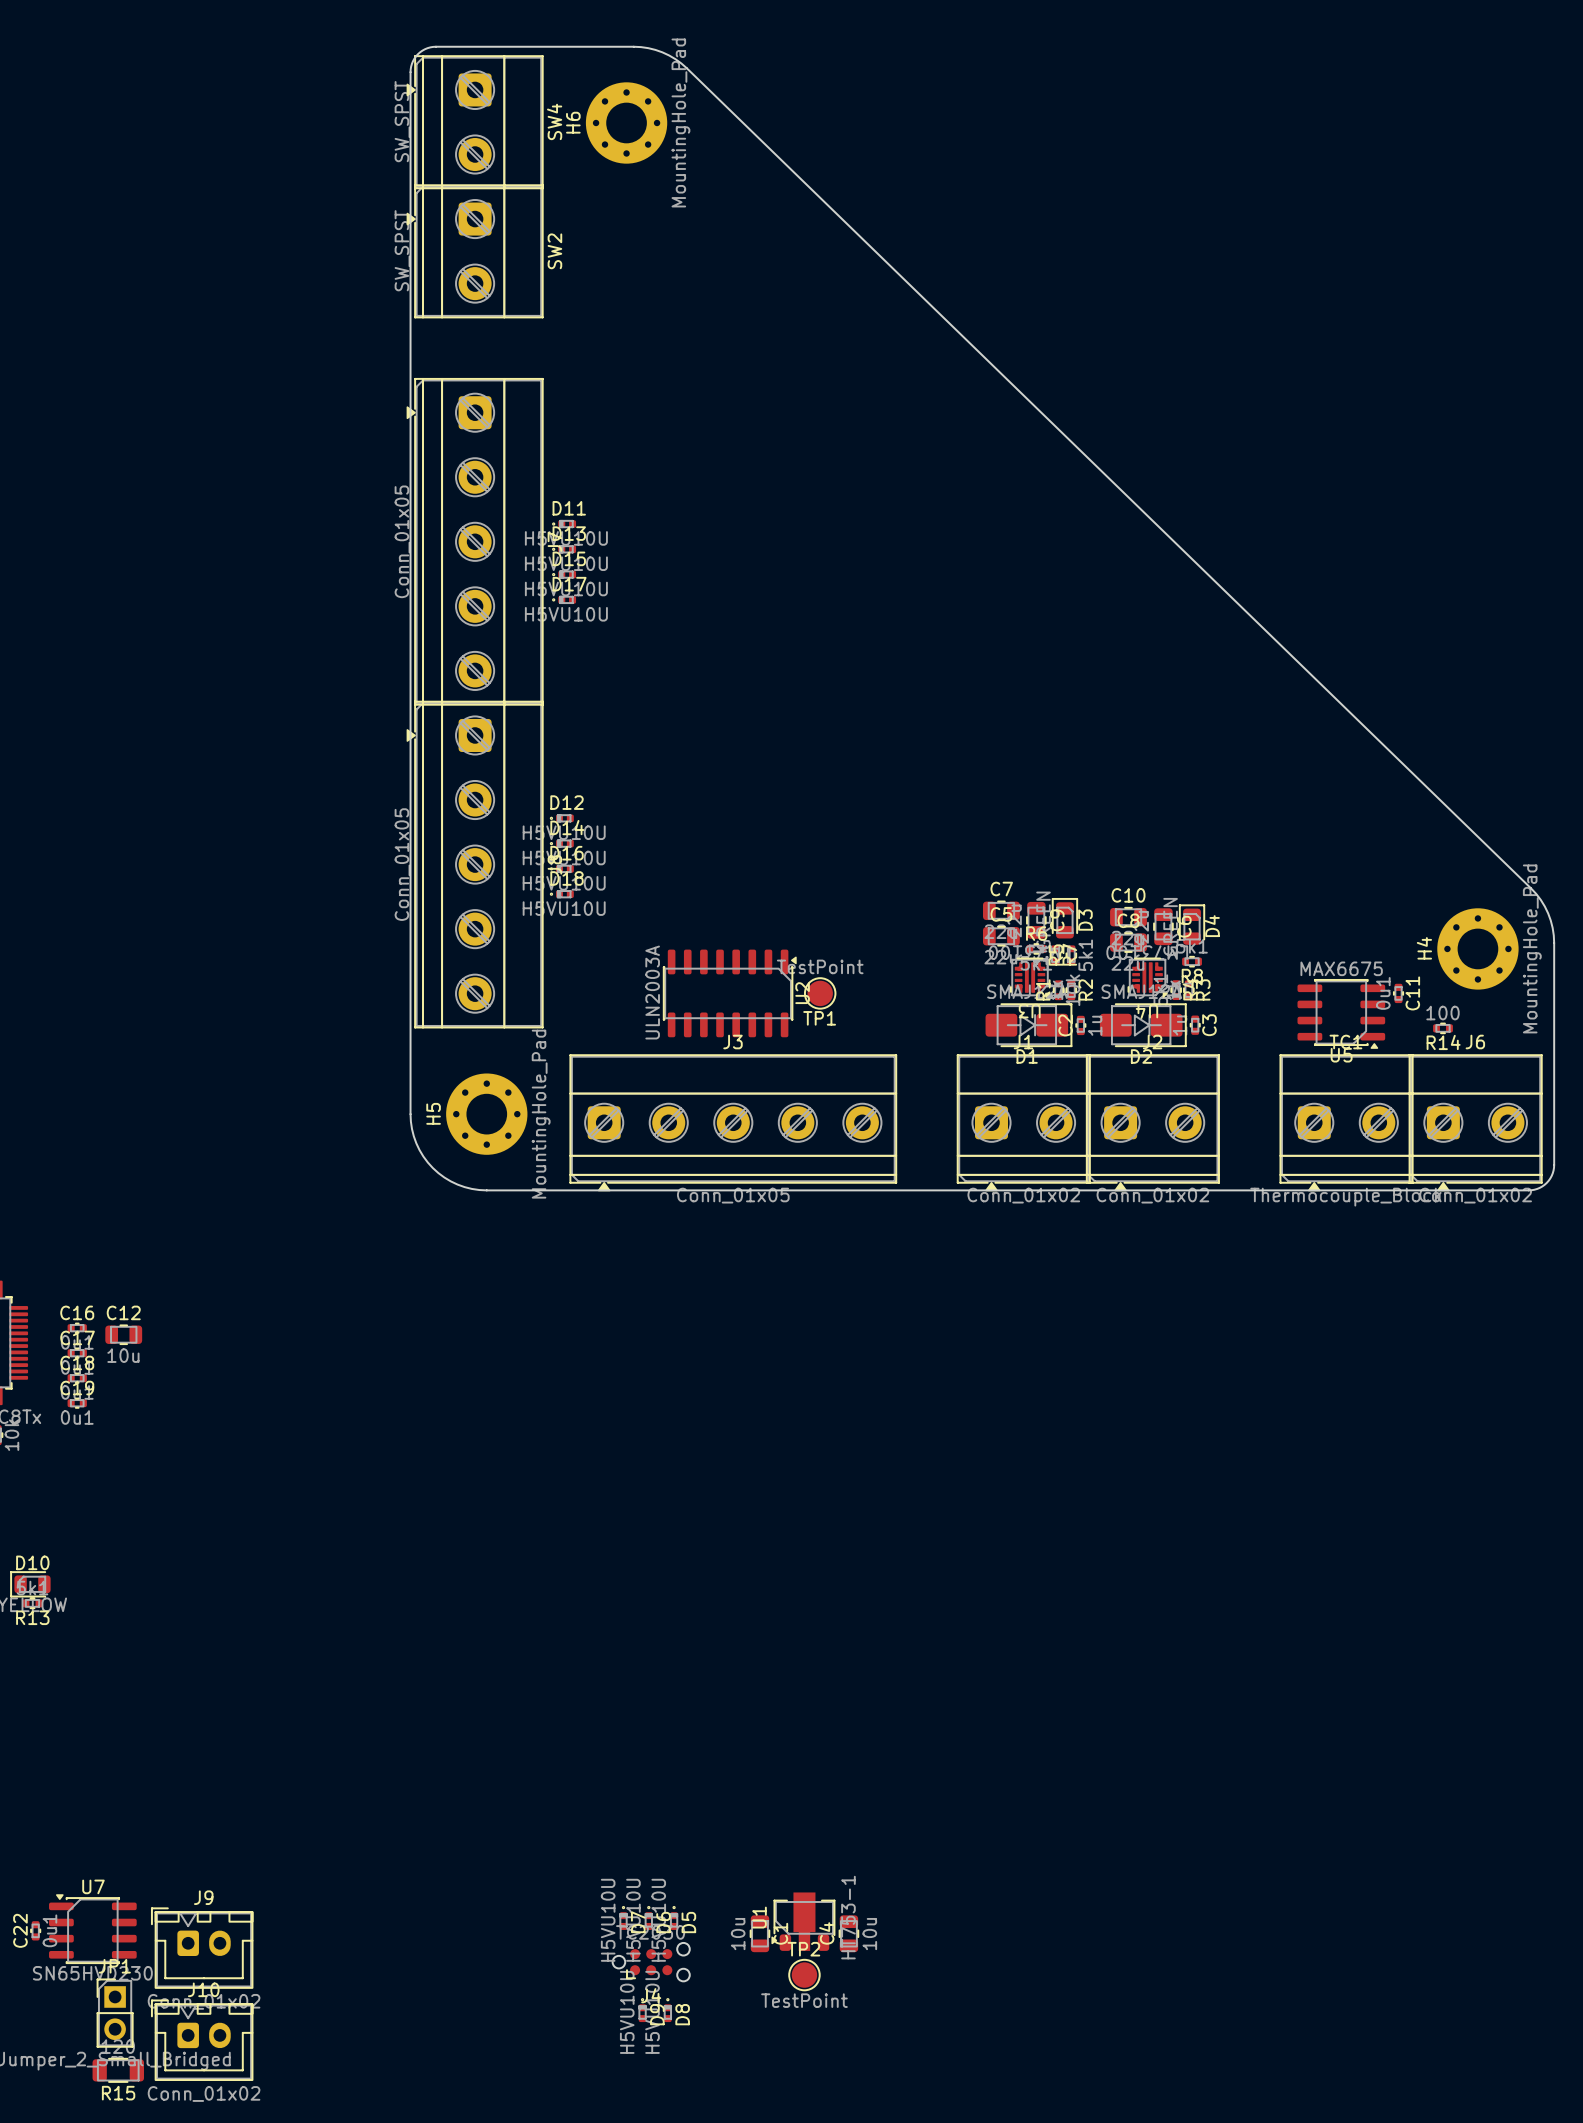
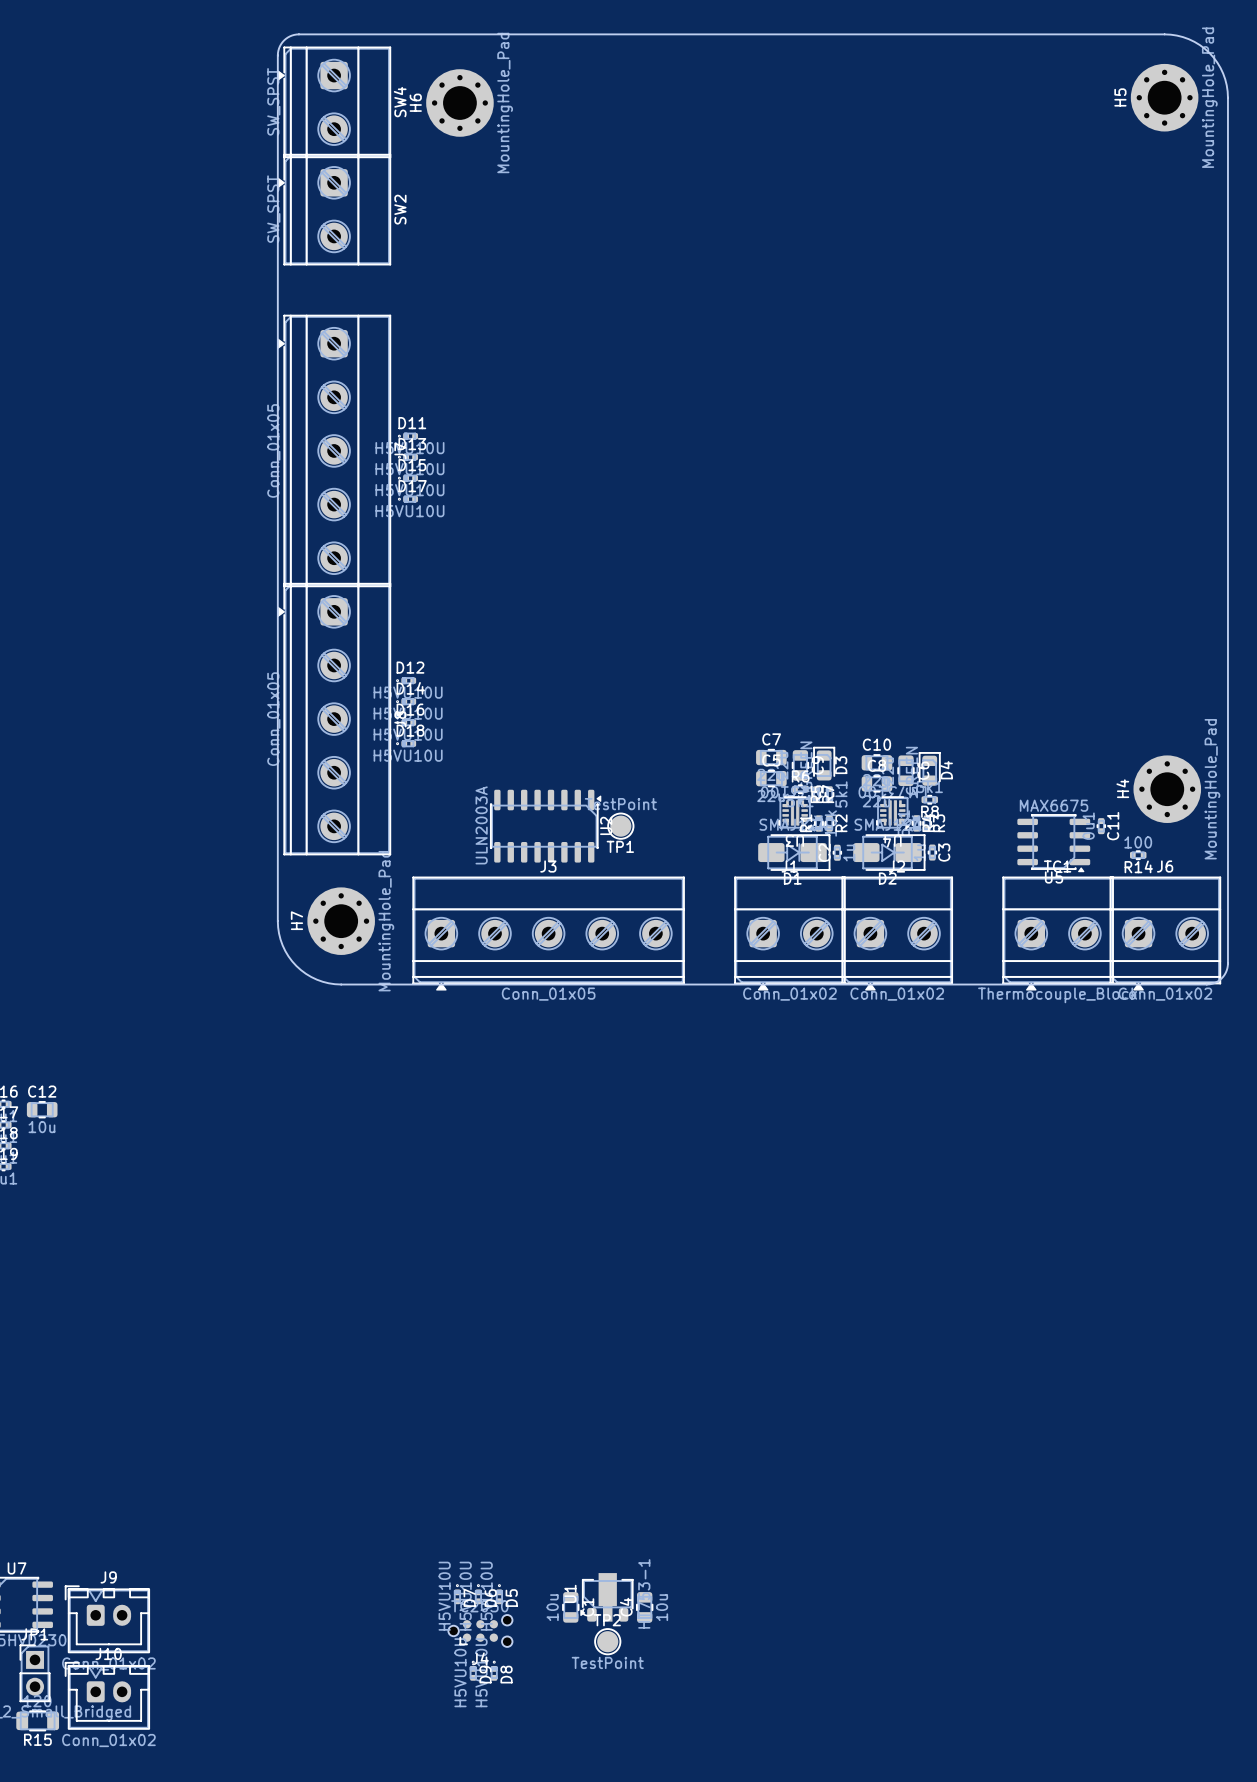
board edge: (435, 46) (641, 47) (662, 52) (681, 63) (1531, 888) (1540, 900) (1548, 913) (1553, 935) (1554, 1164) (1551, 1176) (1546, 1182) (1539, 1187) (1528, 1190) (486, 1190) (457, 1184) (432, 1168) (416, 1143) (410, 1114) (410, 72) (411, 63) (417, 54) (424, 49) (435, 46) -> (298, 34) (289, 36) (284, 40) (279, 48) (277, 55) (277, 921) (282, 945) (296, 965) (316, 979) (341, 984) (1206, 984) (1216, 982) (1221, 978) (1225, 972) (1227, 963) (1227, 97) (1223, 73) (1209, 52) (1188, 39) (1164, 34) (298, 34)
H7: none -> MountingHole_Pad (341, 921)
H5 position: (486, 1114) -> (1164, 97)

